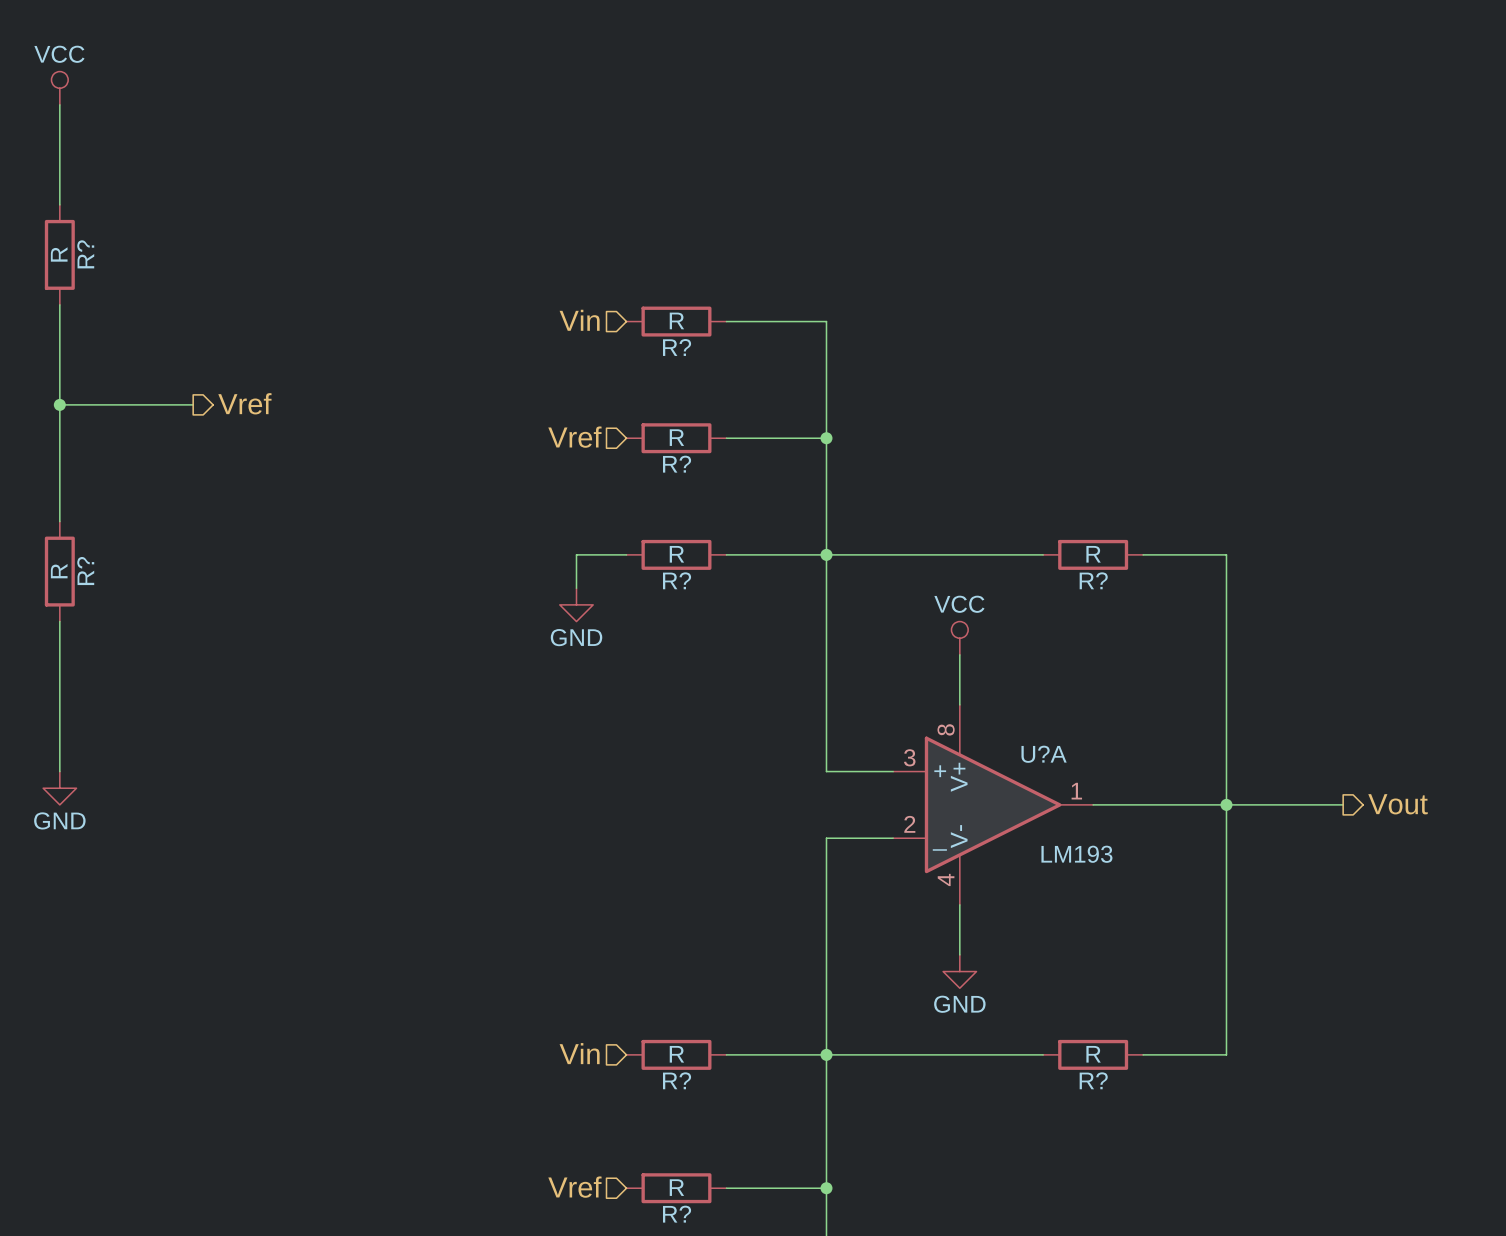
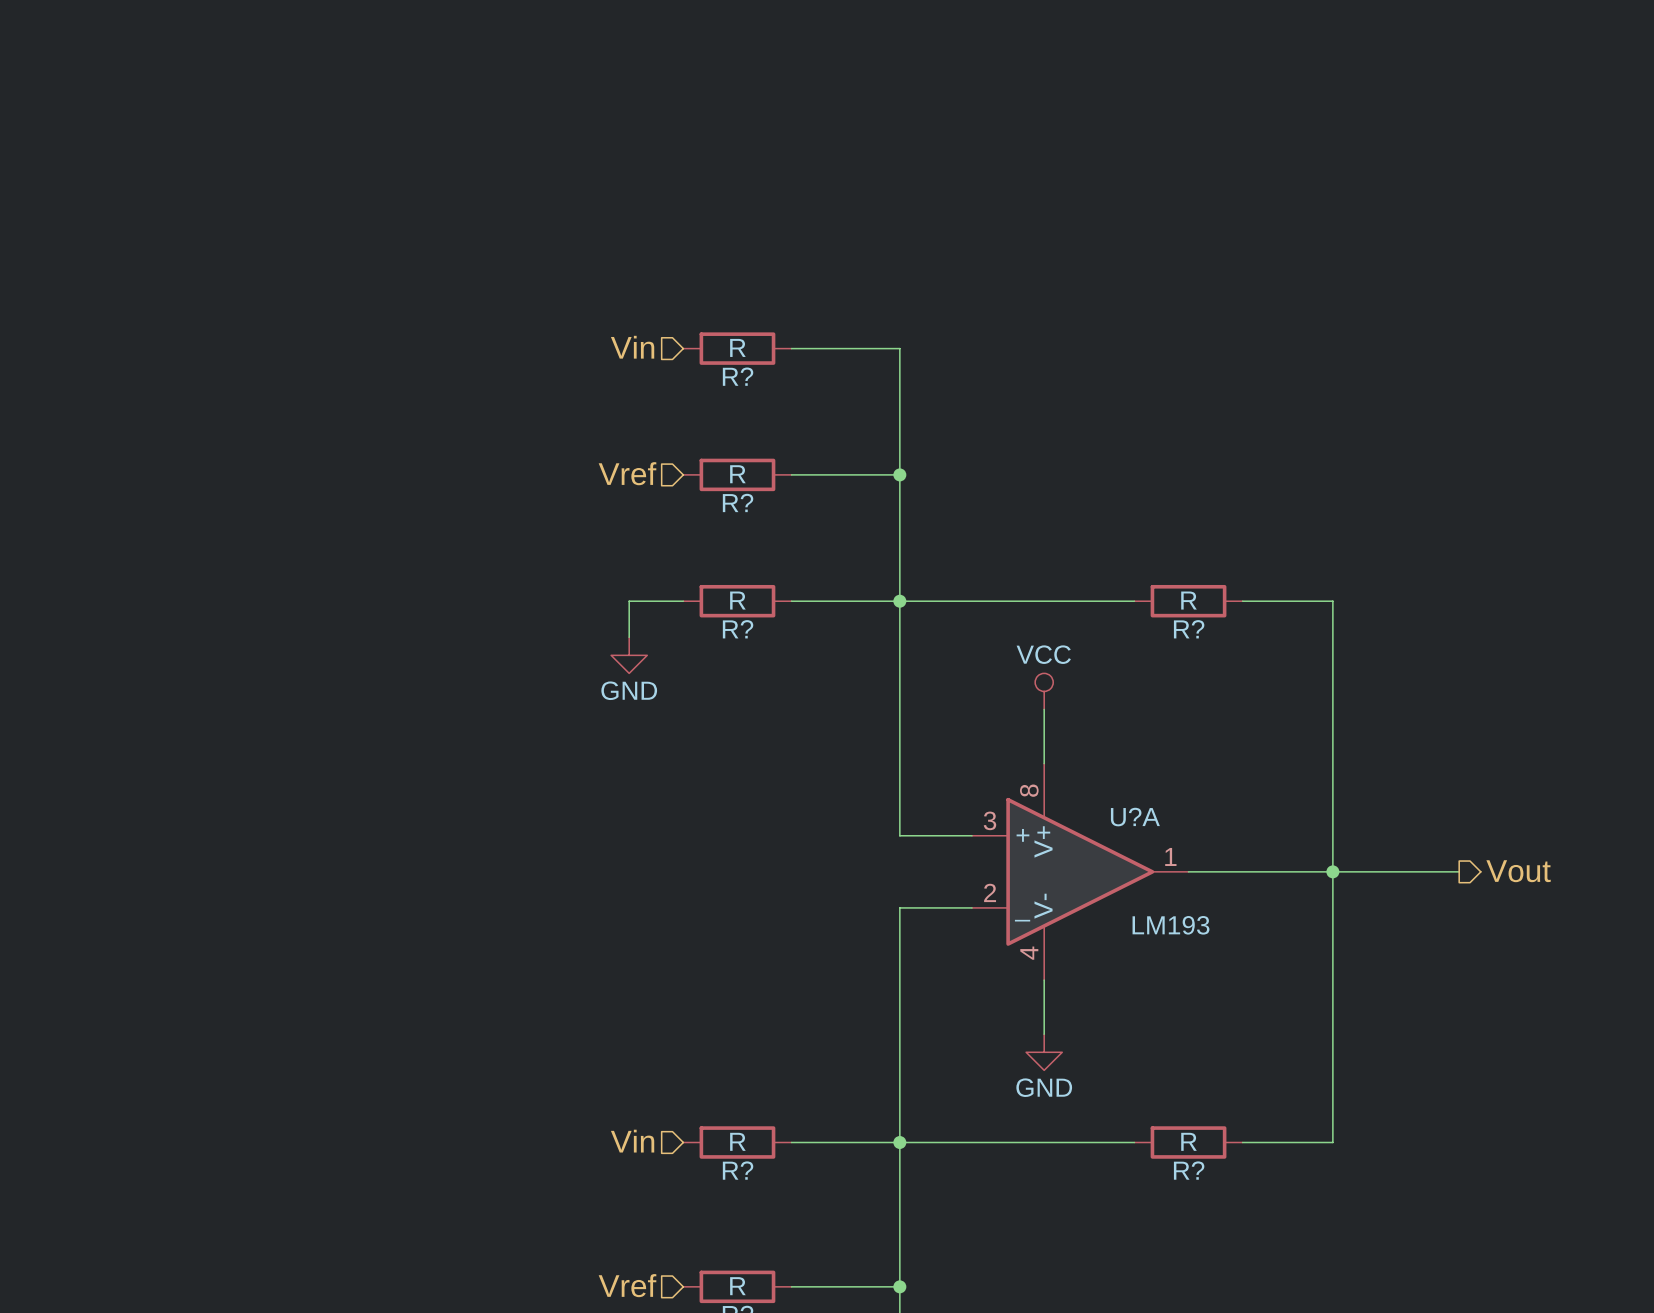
power symbol: VCC (59, 88) -> none
wire: (59, 104) (59, 204) -> none
R?: R (59, 254) -> none
wire: (59, 304) (59, 521) -> none
hierarchical label: Vref (244, 403) -> none
wire: (59, 404) (193, 404) -> none
junction: (59, 404) -> none
R?: R (59, 571) -> none
wire: (59, 621) (59, 771) -> none
power symbol: GND (59, 788) -> none

